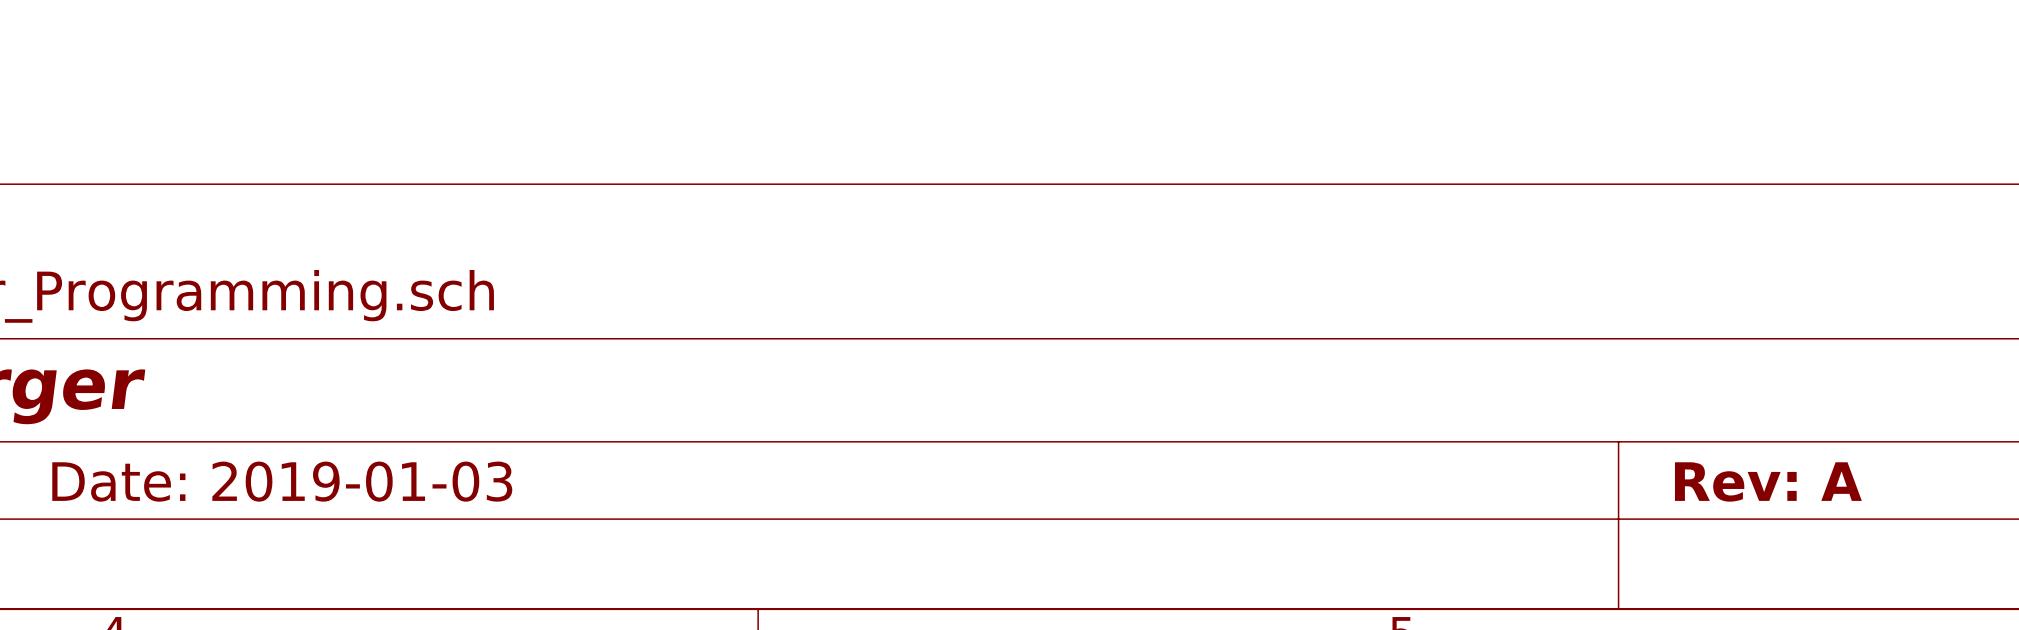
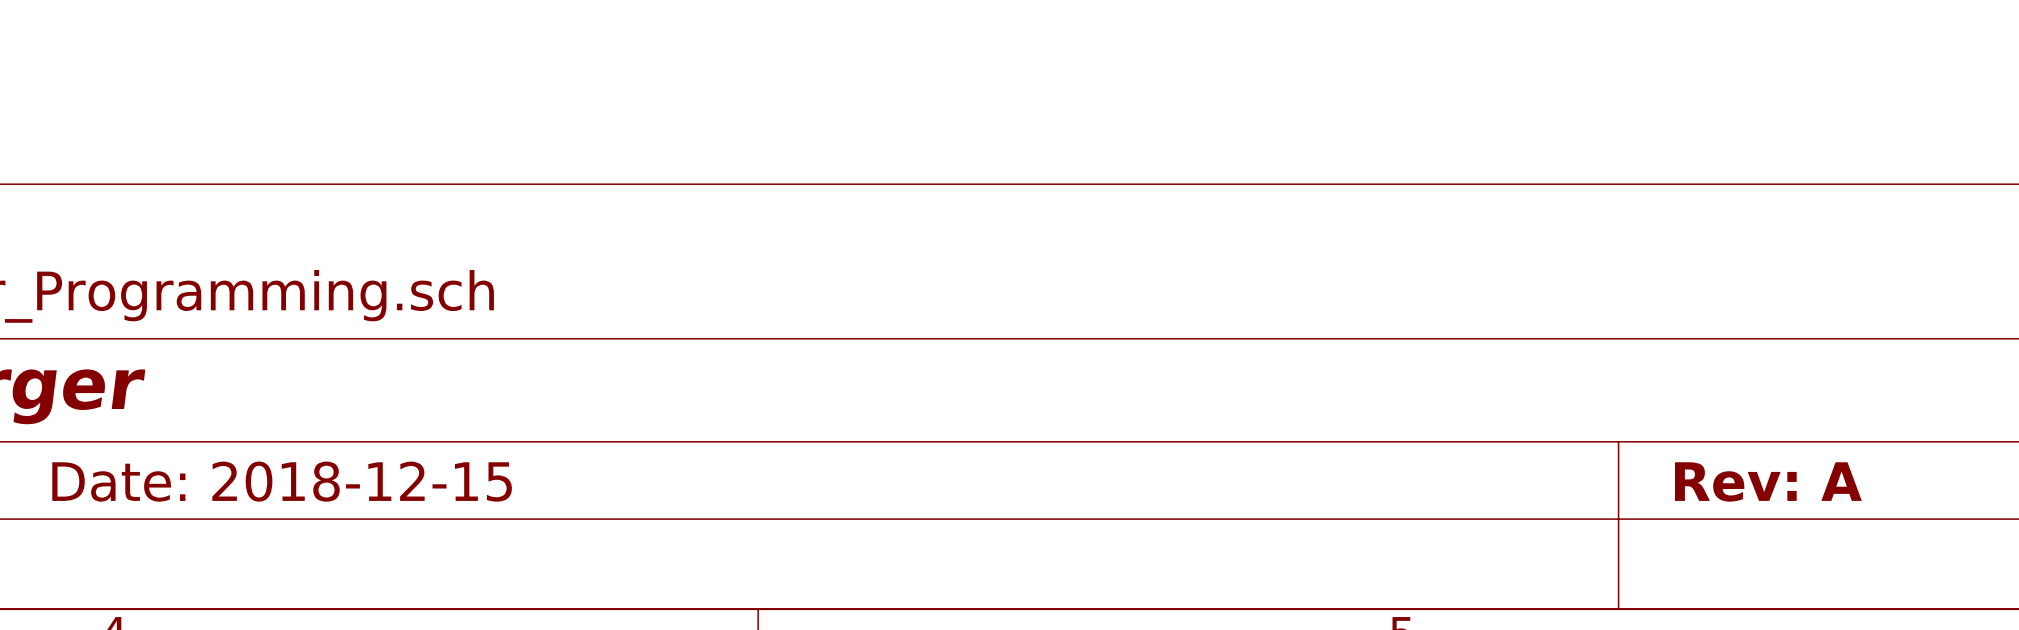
title block: Date: 2019-01-03 (282, 481) -> Date: 2018-12-15 (282, 481)

